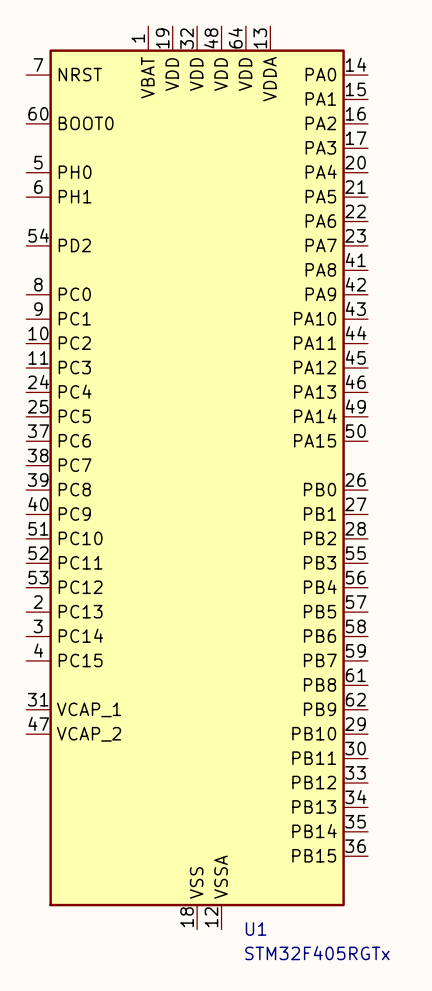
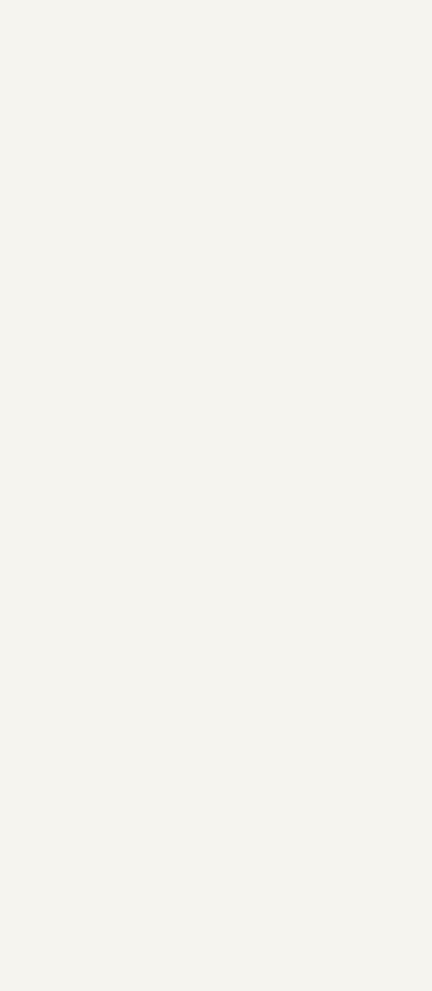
U1: STM32F405RGTx (197, 477) -> none

